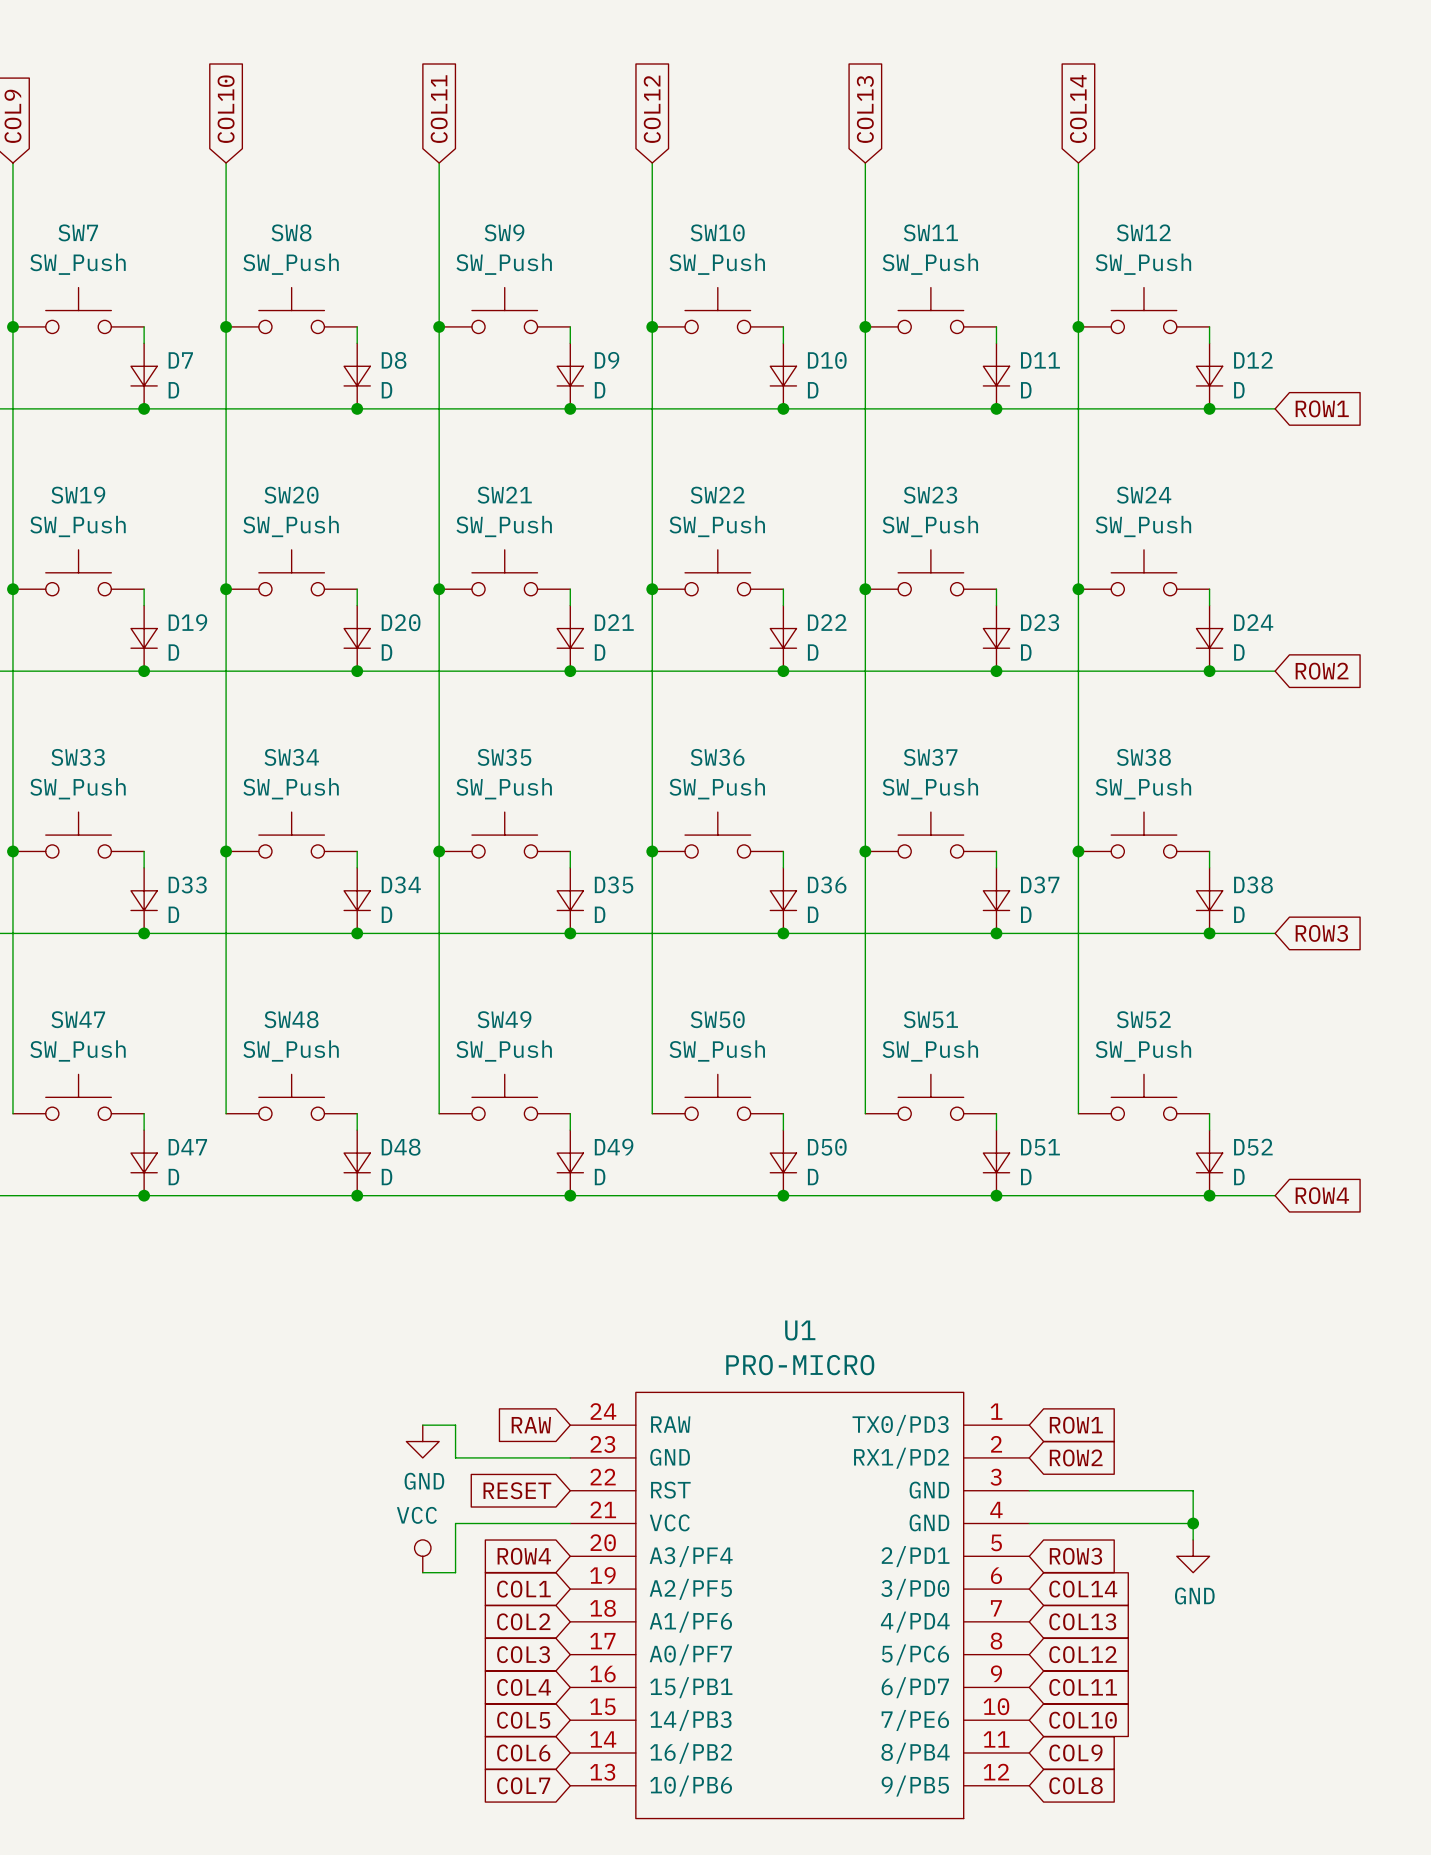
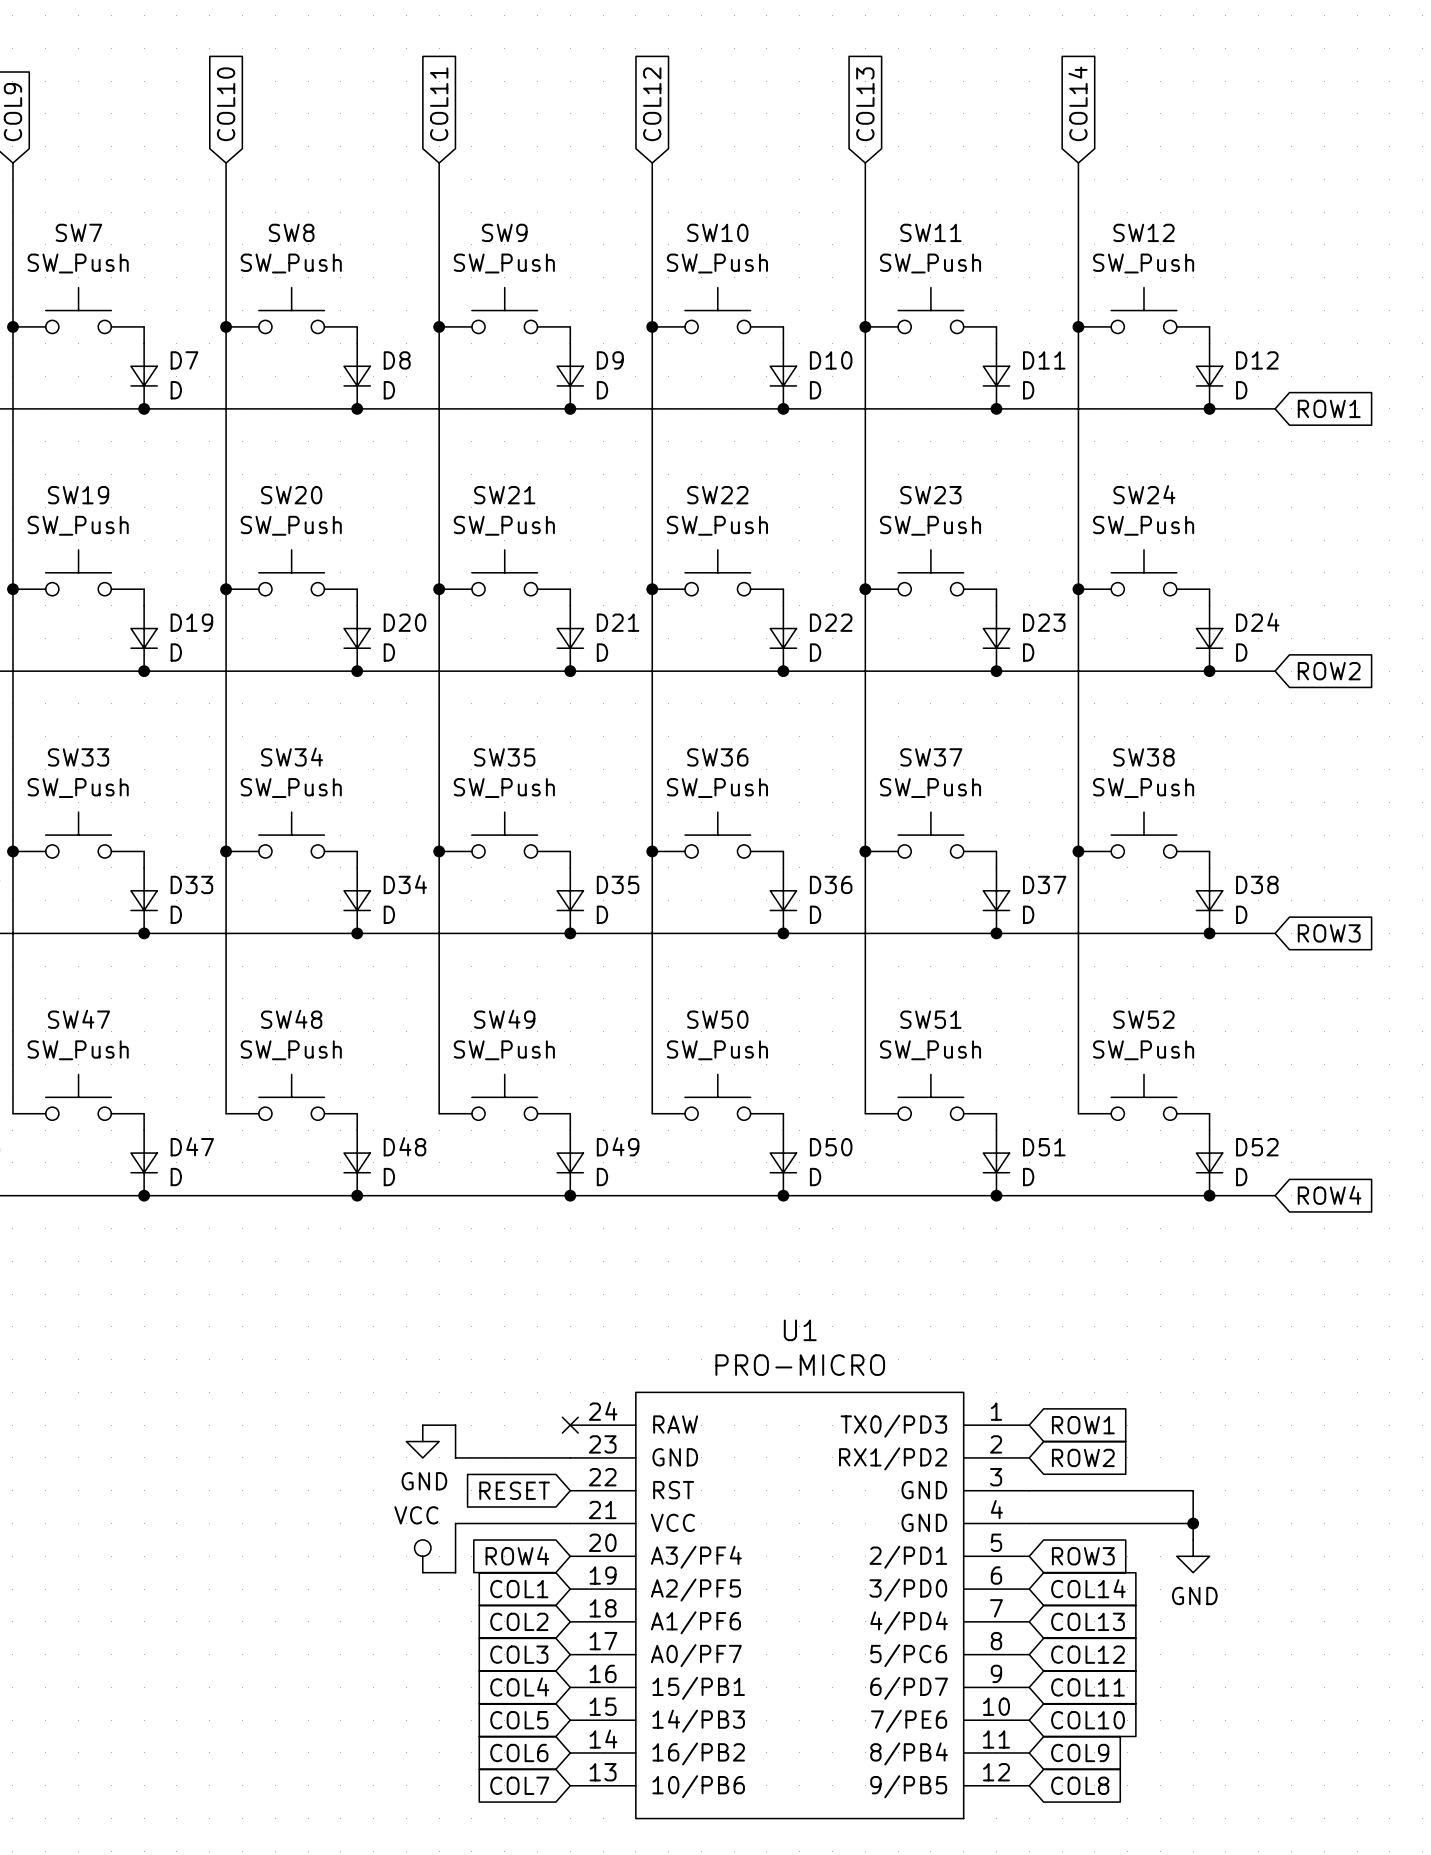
global label: RAW (531, 1425) -> none
no-connect mark: none -> (570, 1425)

